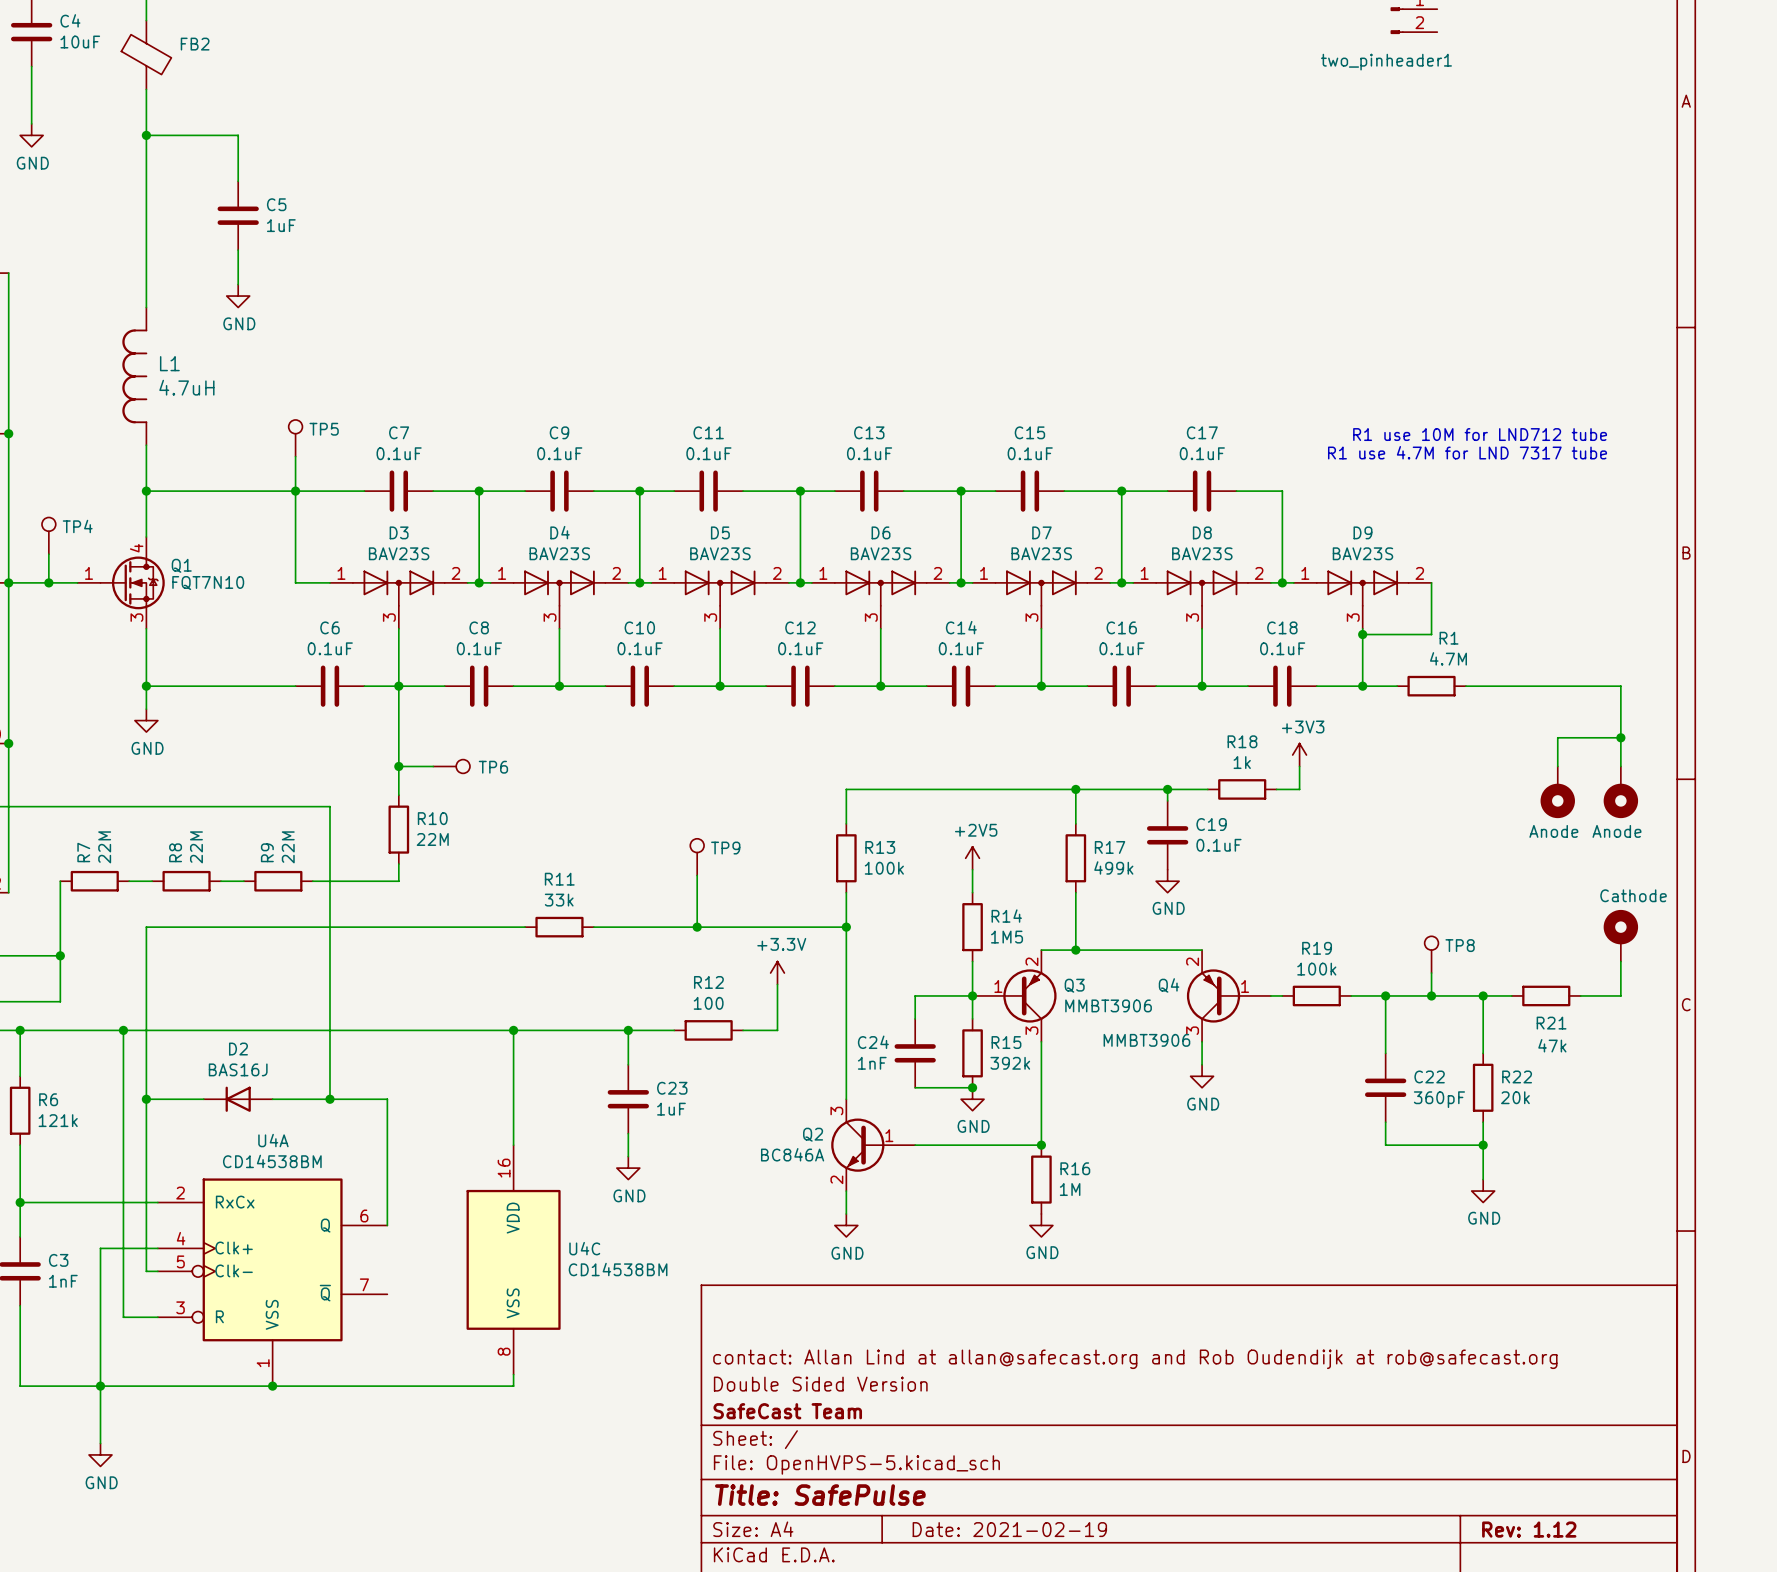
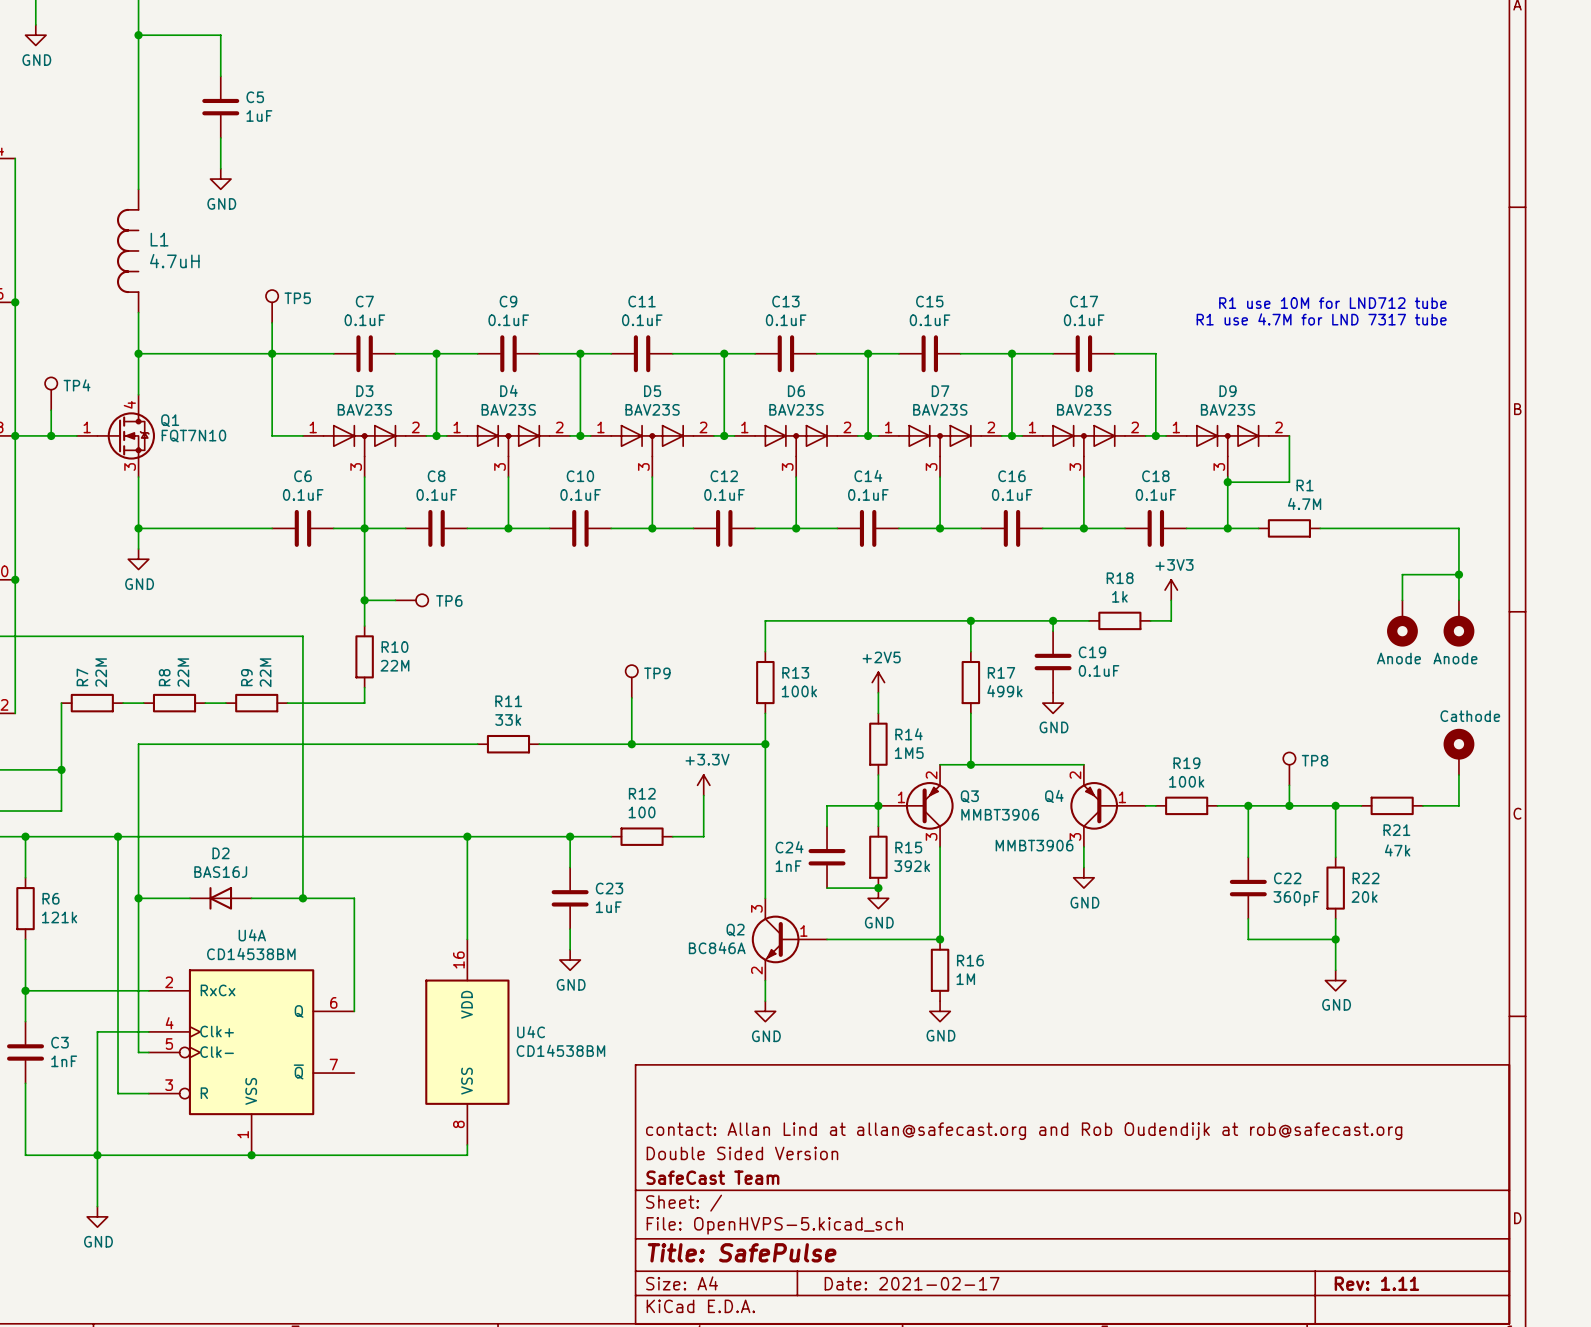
title block: Date: 2021-02-19 (1009, 1529) -> Date: 2021-02-17 (912, 1283)
title block: Rev: 1.12 (1529, 1529) -> Rev: 1.11 (1376, 1283)

